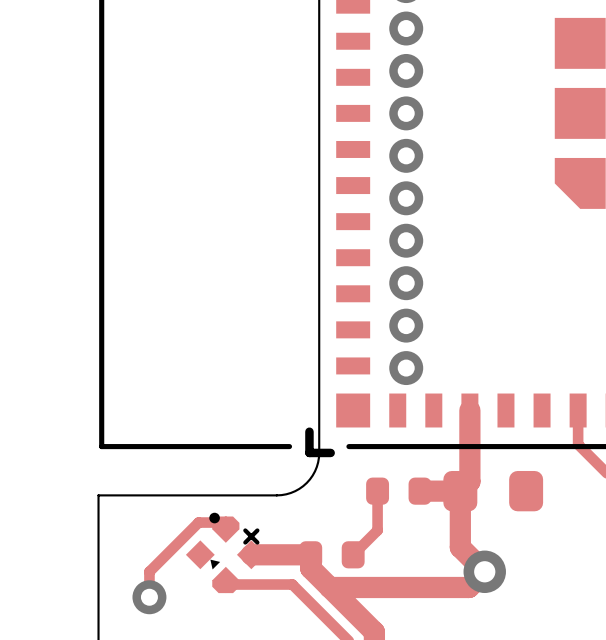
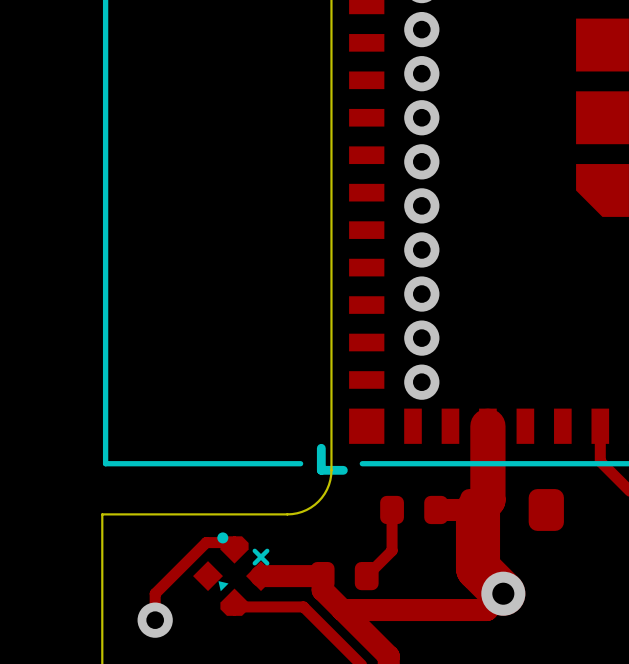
track width: thin (469, 410) (469, 481) (460, 491) (460, 547) (484, 571) -> thick (487, 426) (487, 500) (478, 509) (478, 568) (503, 593)

